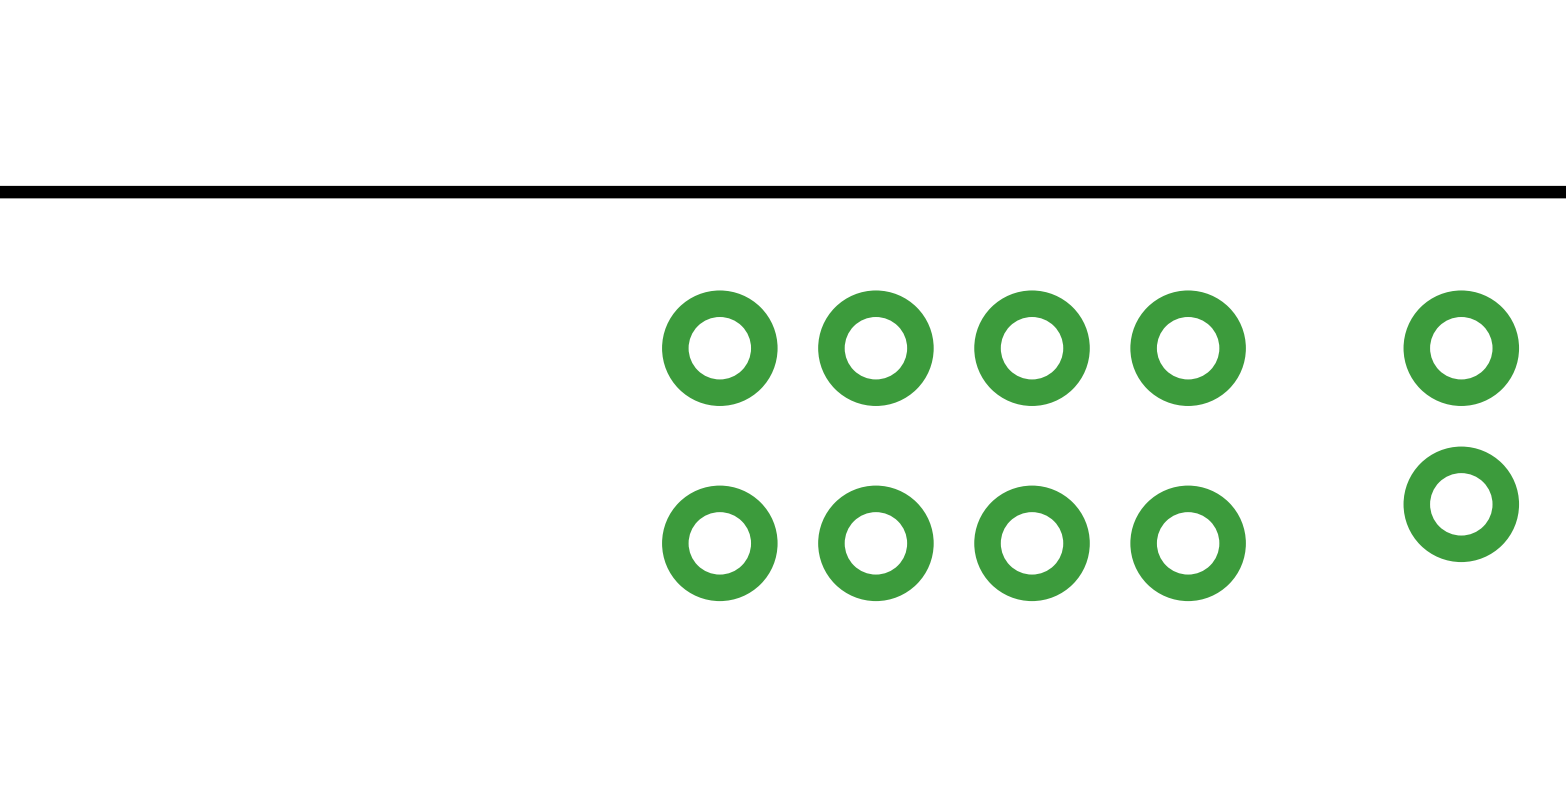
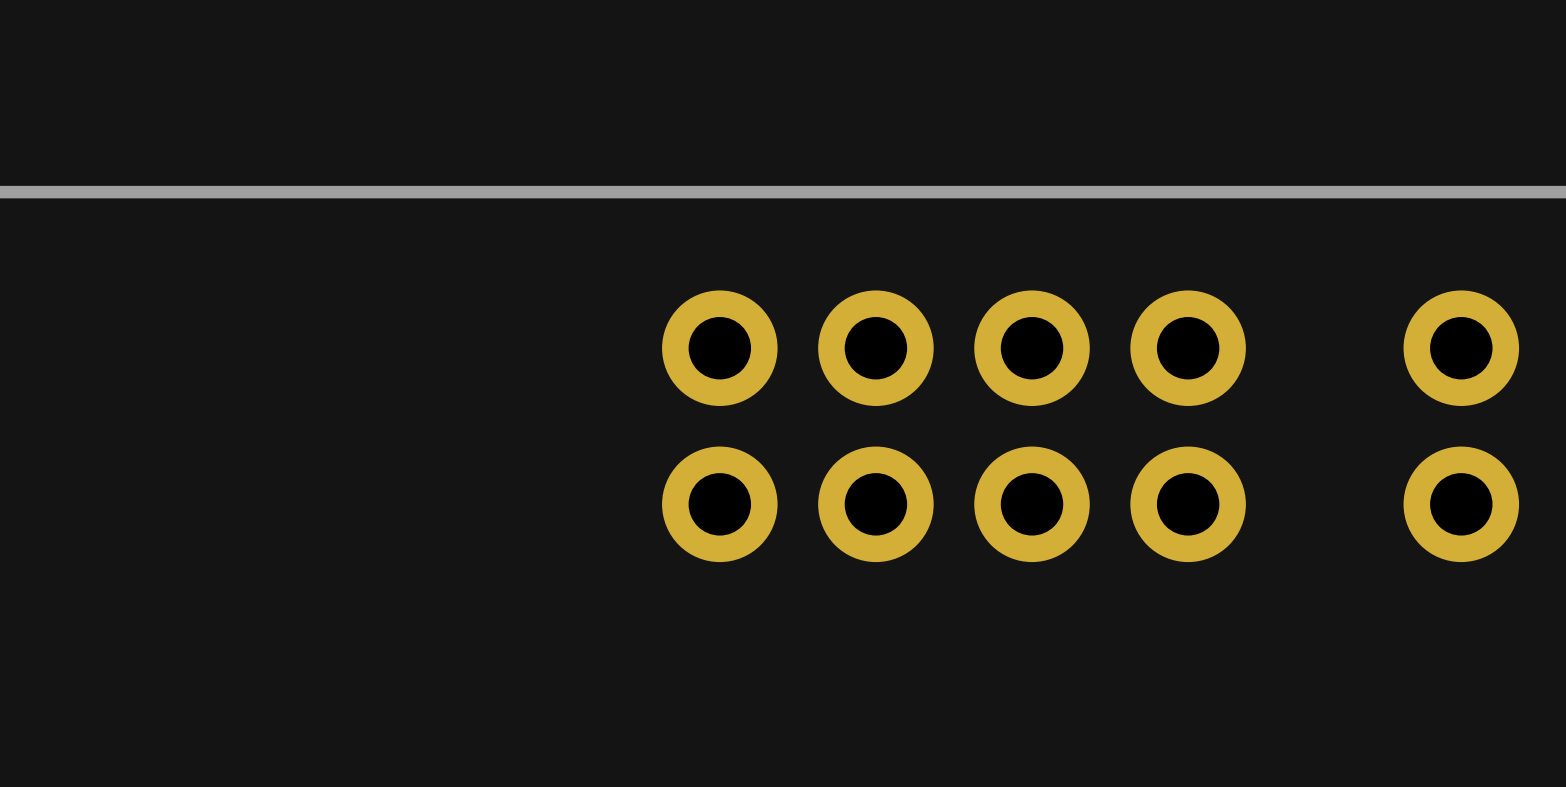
part position: (953, 543) -> (953, 504)

